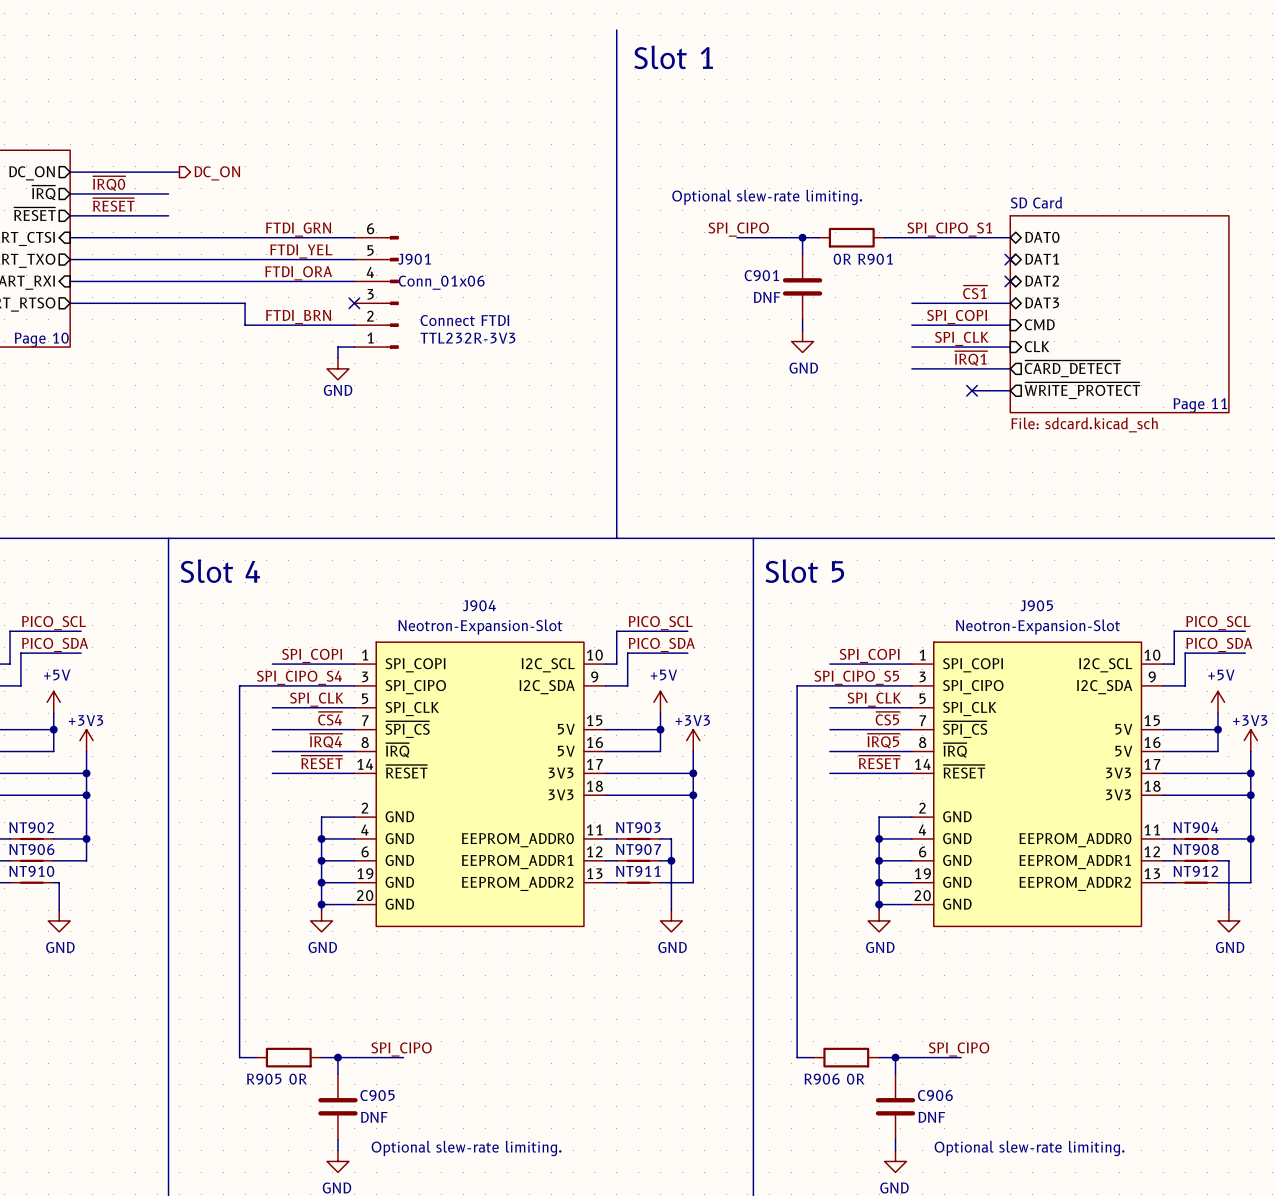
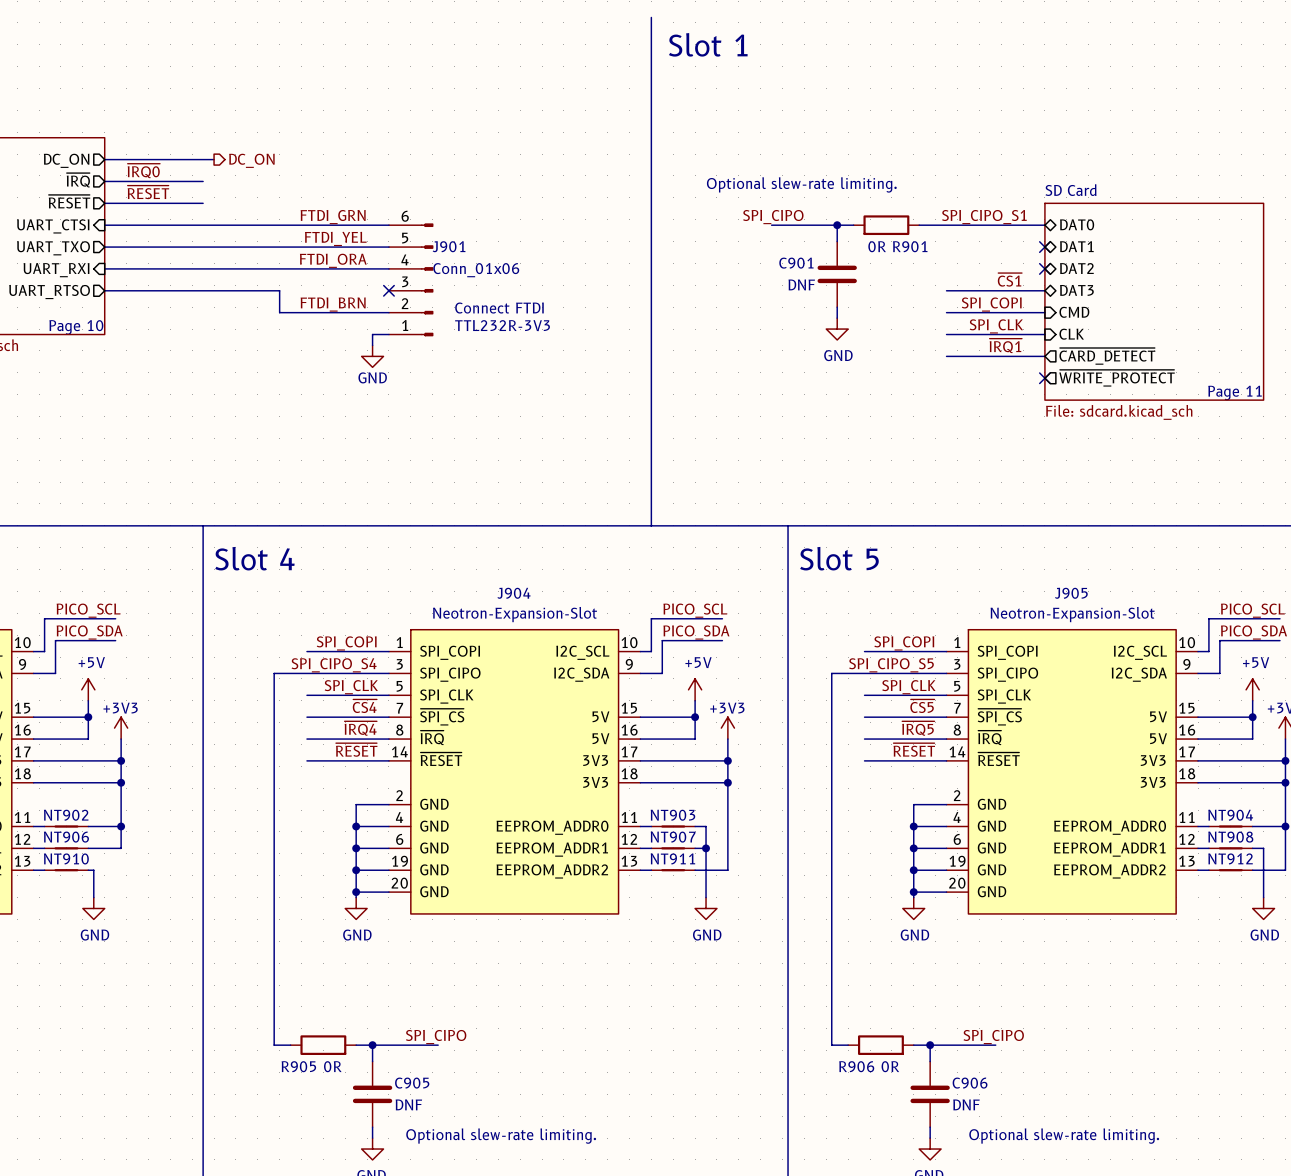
wire: (972, 390) (1010, 390) -> none
no-connect mark position: (972, 390) -> (1044, 378)

